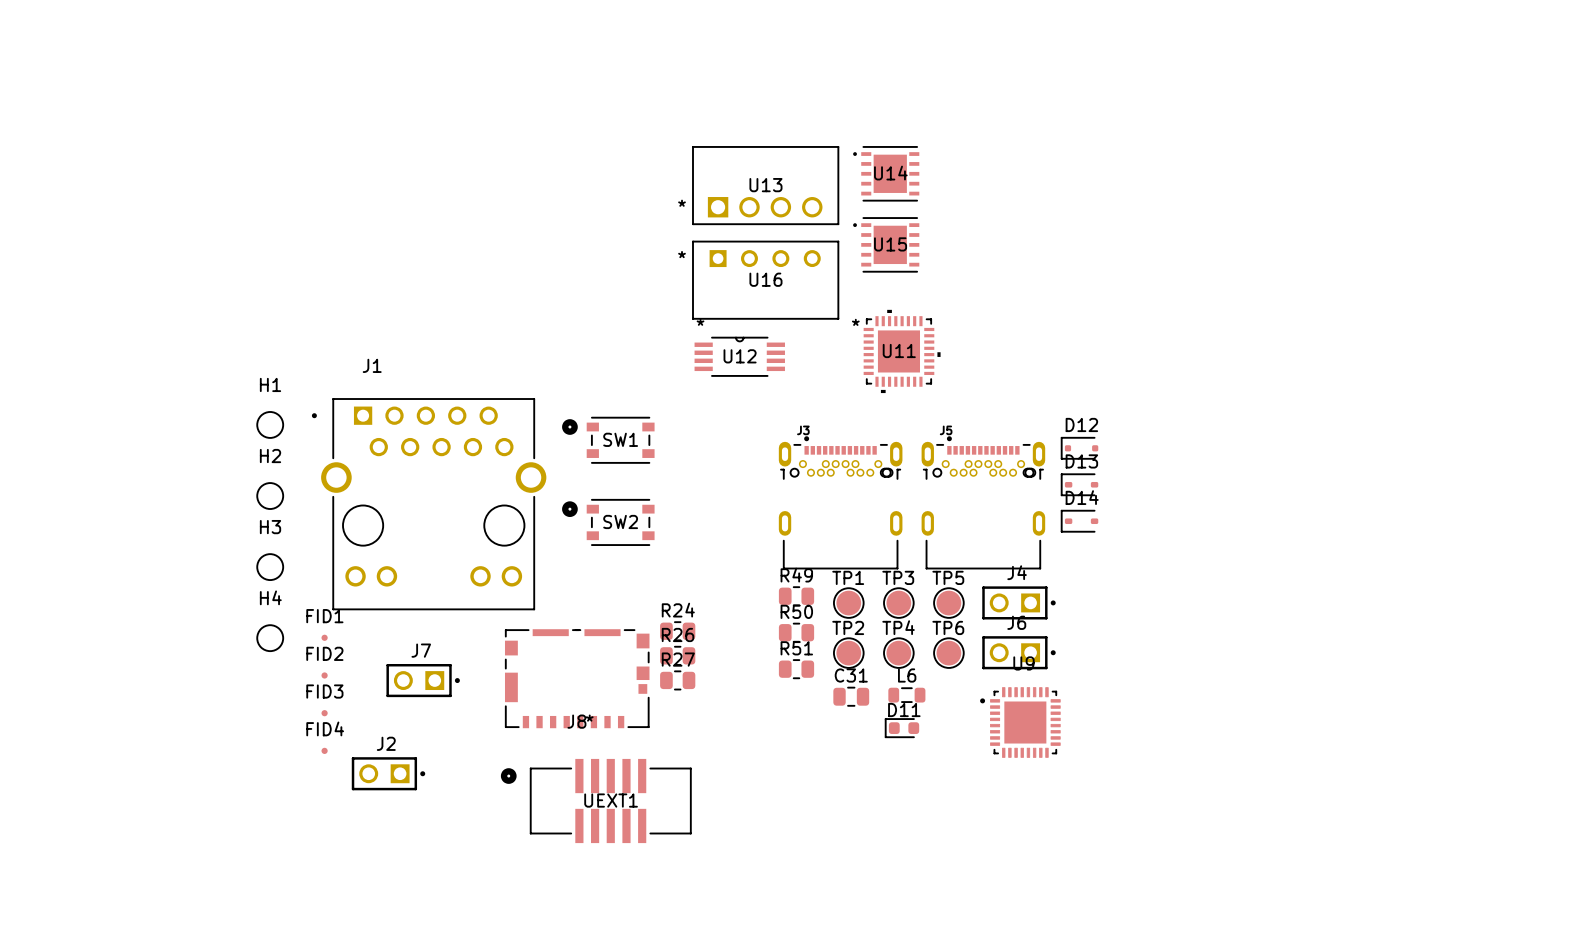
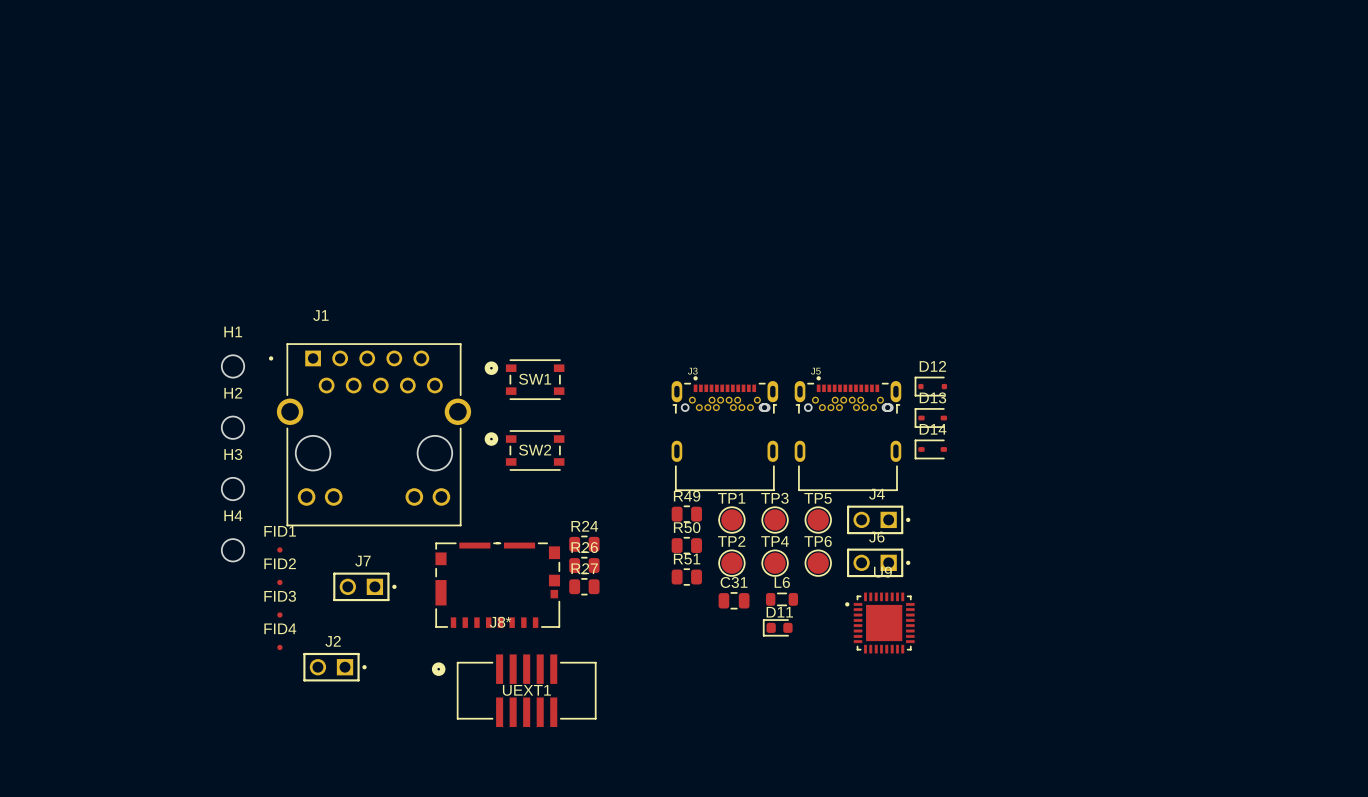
U14: (886, 173) -> none
U13: (765, 185) -> none
U15: (886, 244) -> none
U16: (765, 280) -> none
U11: (902, 351) -> none
U12: (739, 356) -> none

